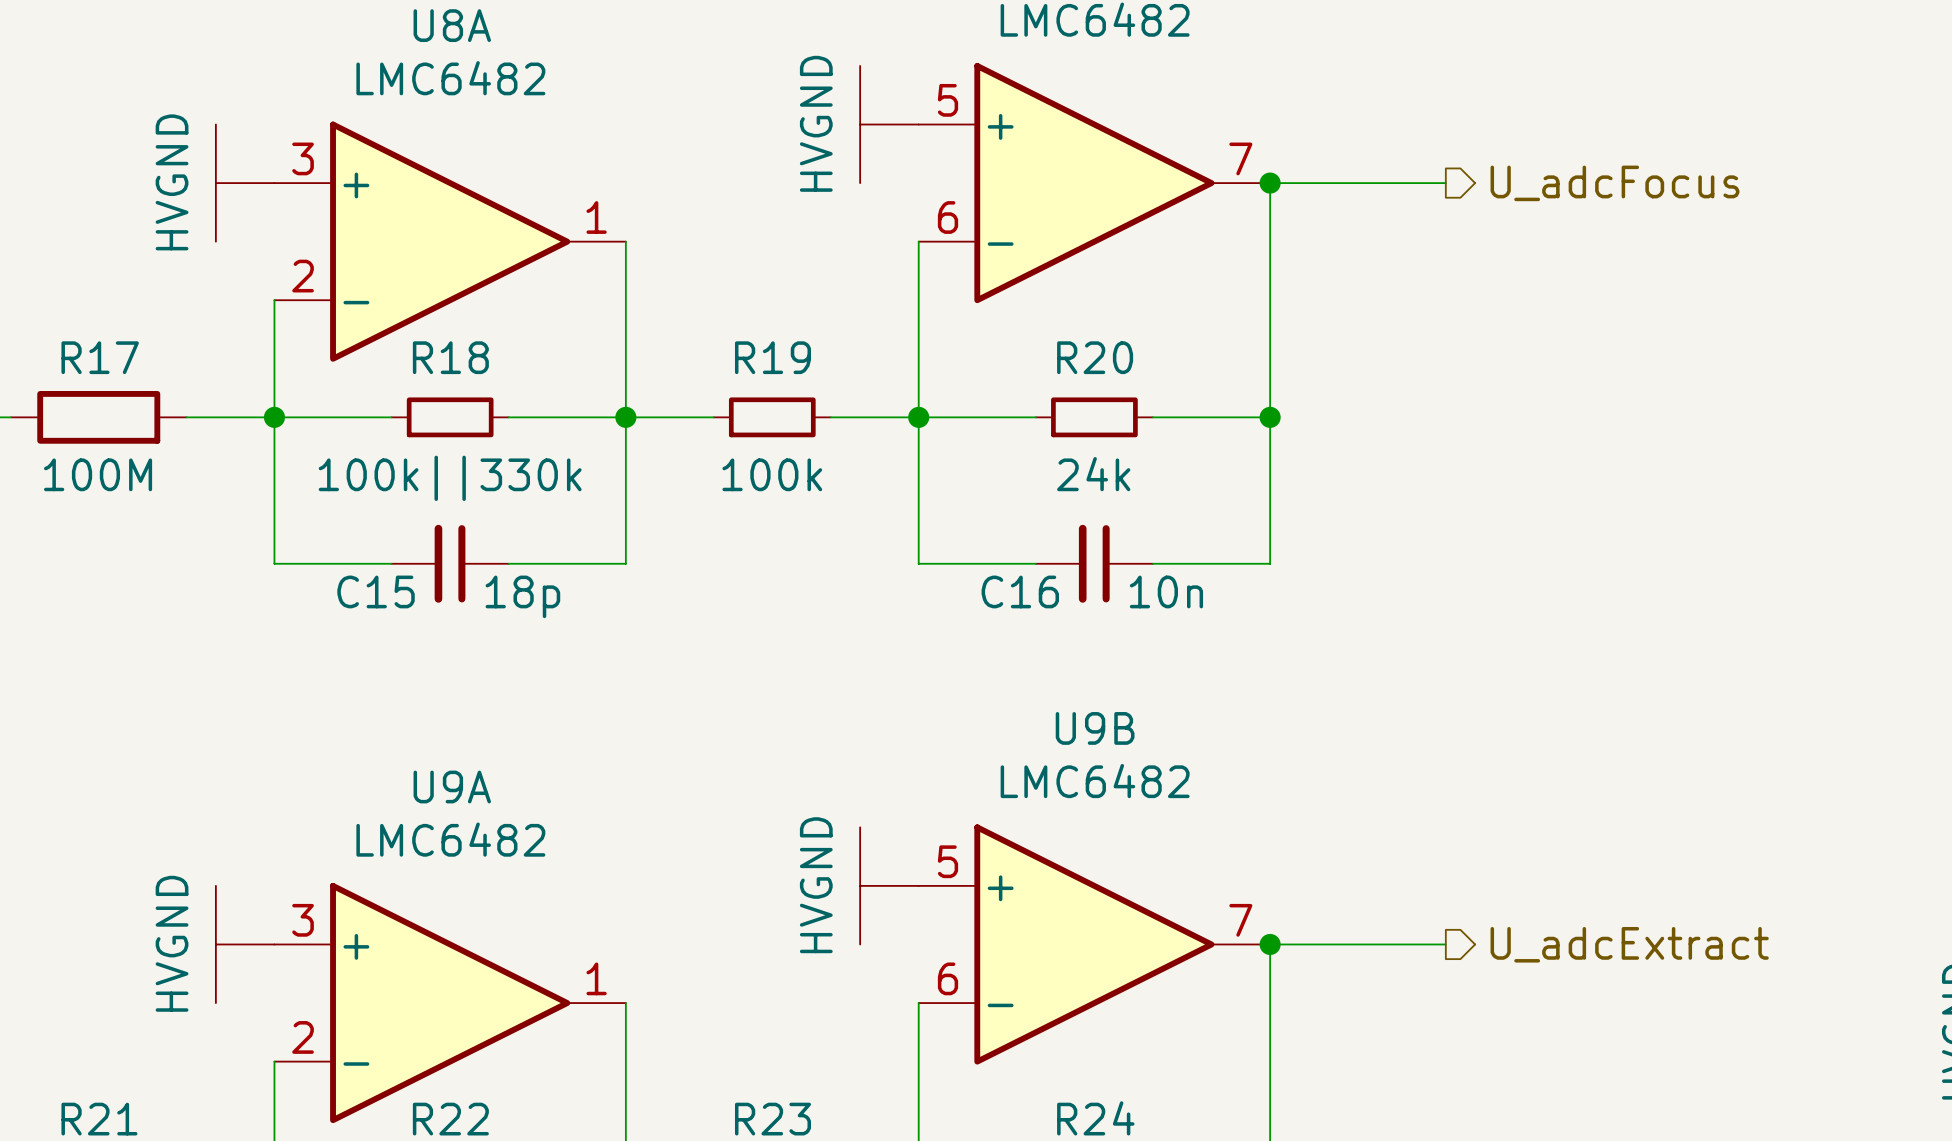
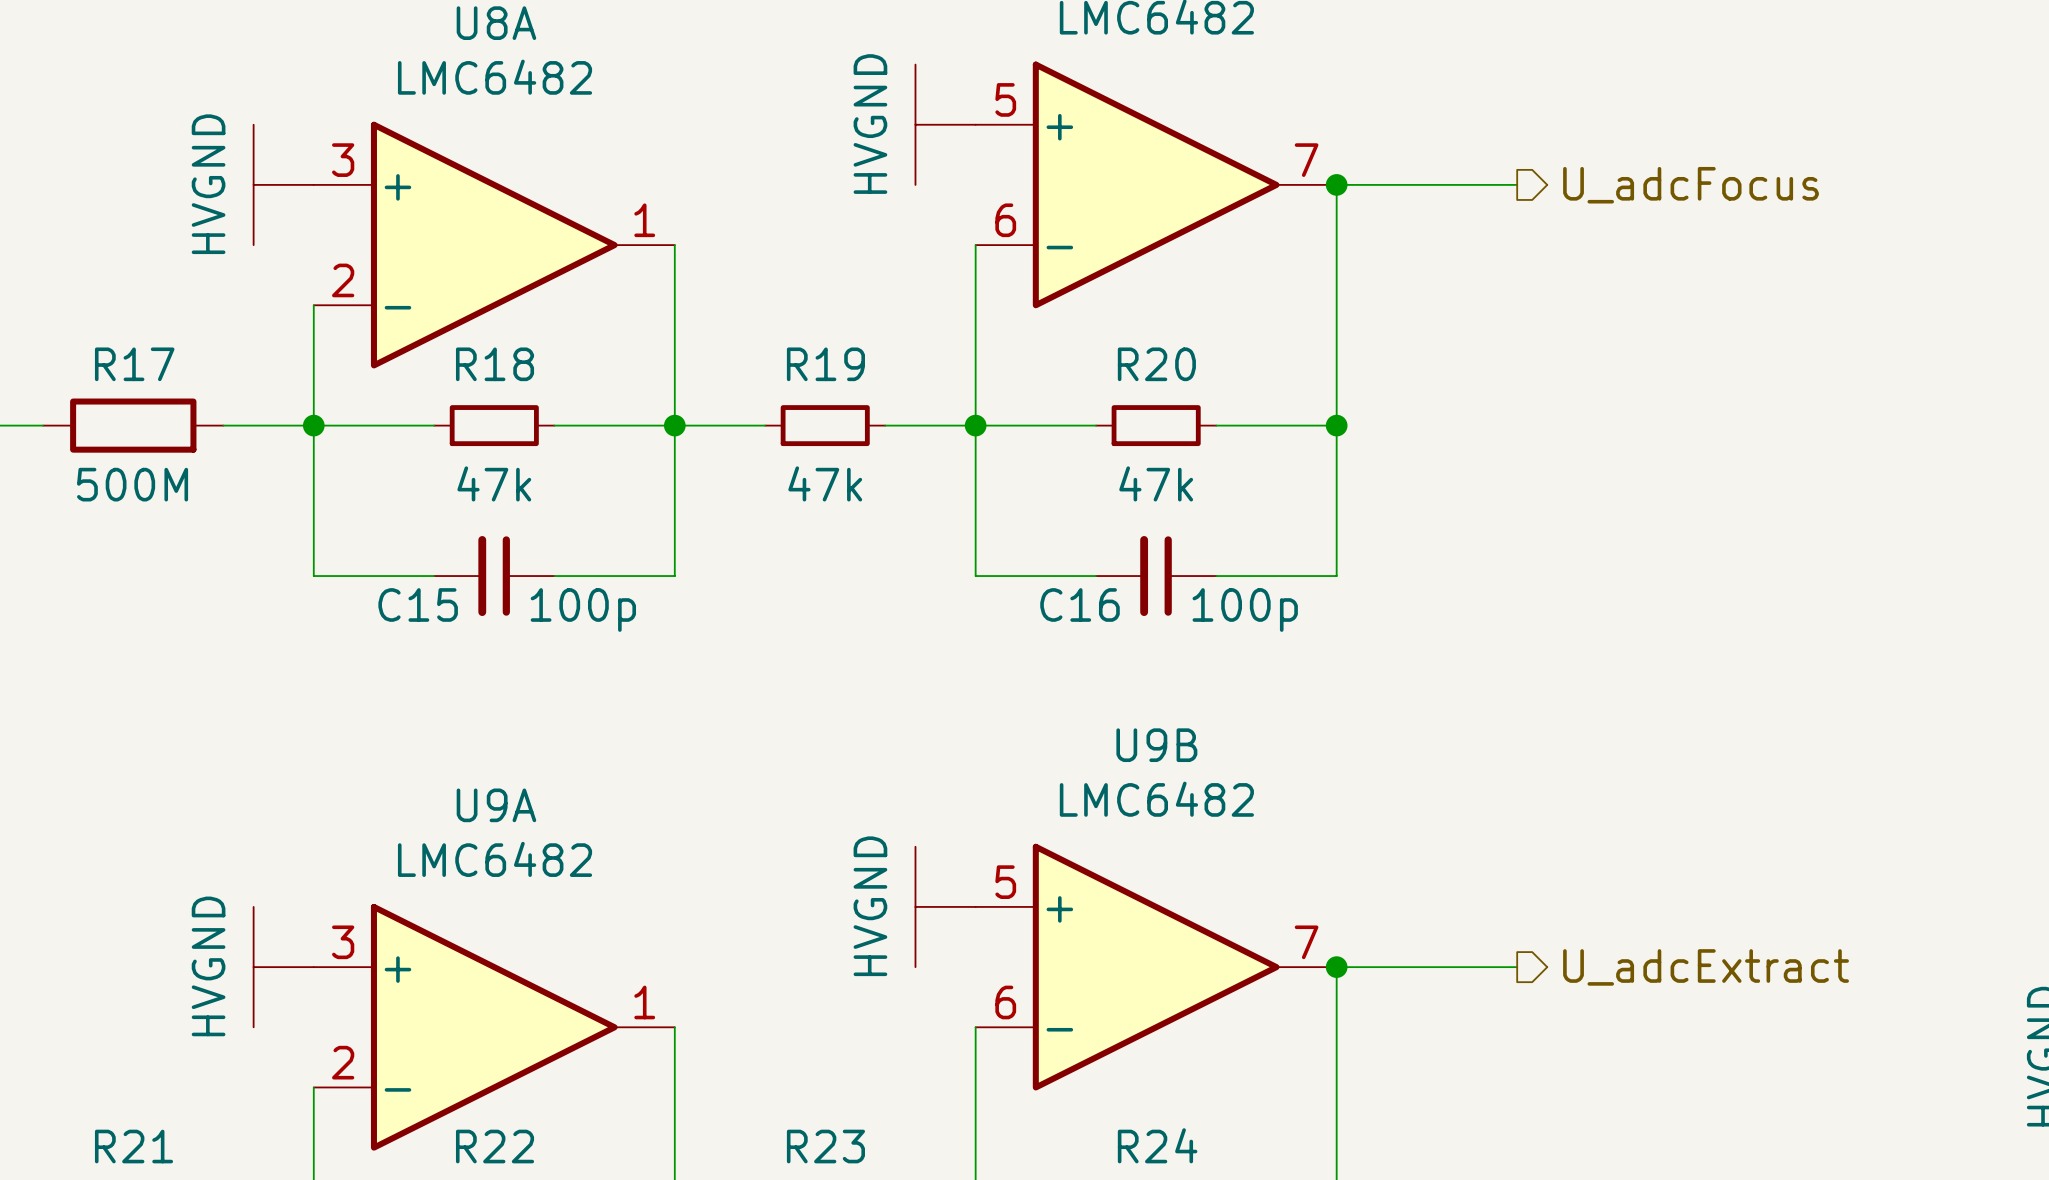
R17 value: 100M (98, 474) -> 500M (132, 484)
R19 value: 100k (772, 474) -> 47k (825, 483)
R20 value: 24k (1093, 474) -> 47k (1156, 483)
R18 value: 100k||330k (450, 478) -> 47k (494, 483)
C16 value: 10n (1166, 591) -> 100p (1245, 610)
C15 value: 18p (522, 596) -> 100p (583, 610)

